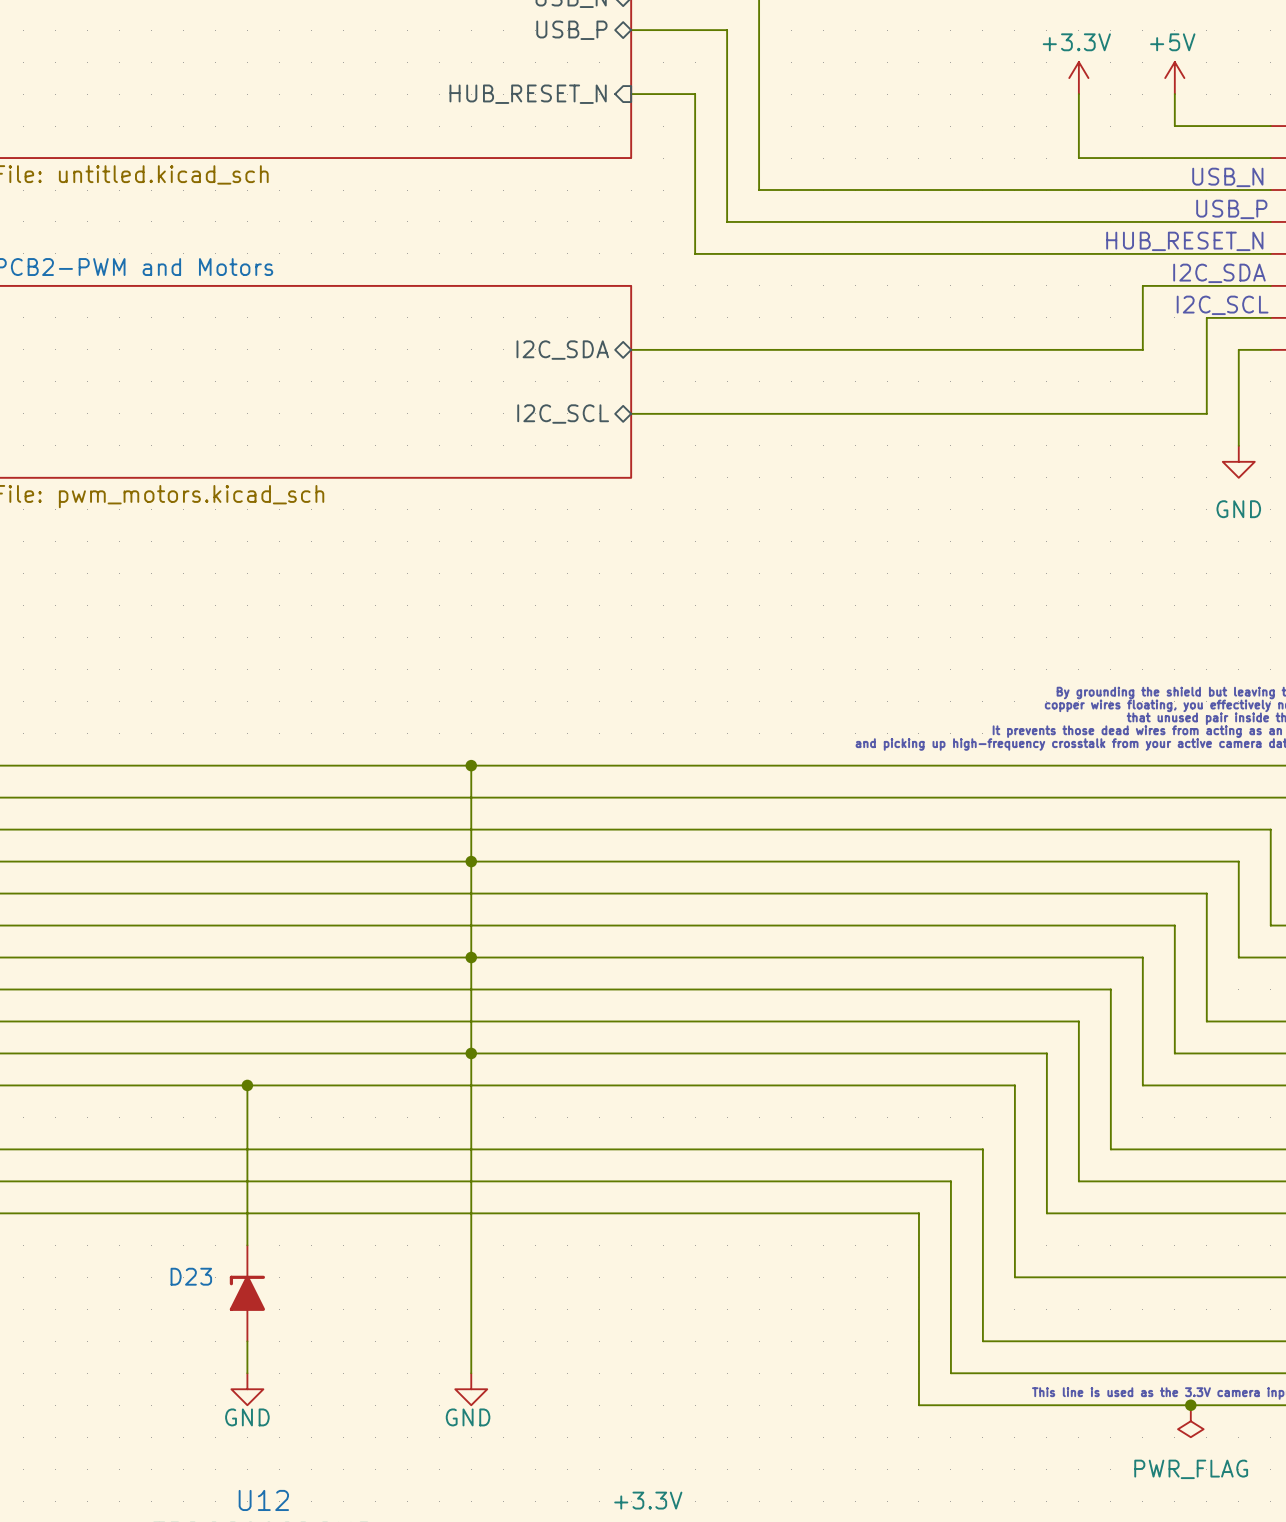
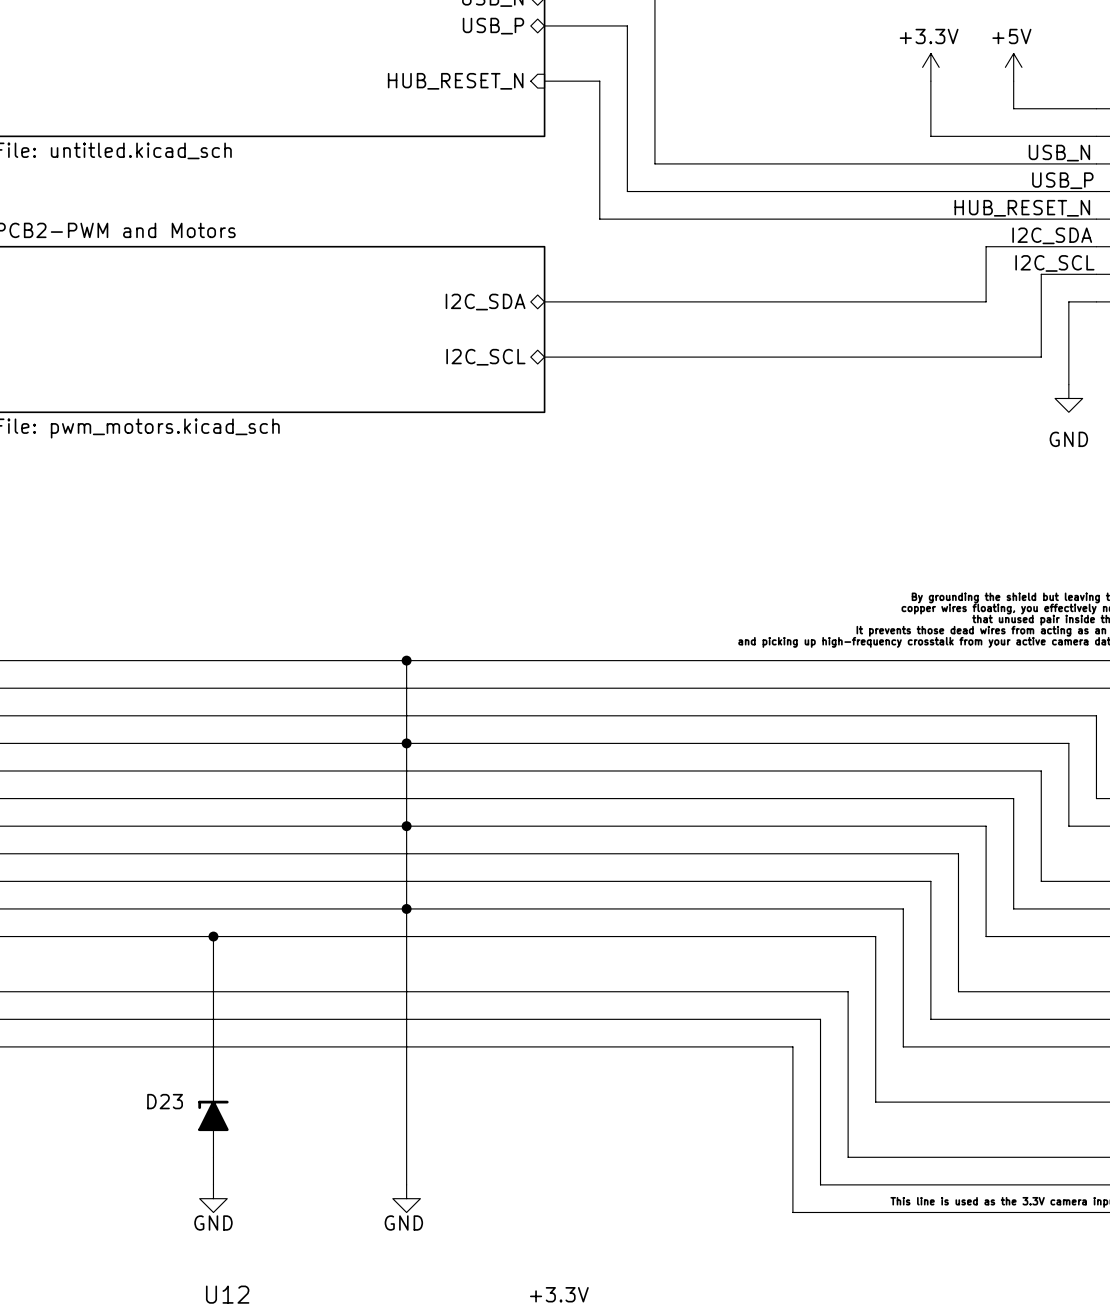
junction: (1190, 1405) -> none
power symbol: PWR_FLAG (1190, 1421) -> none

